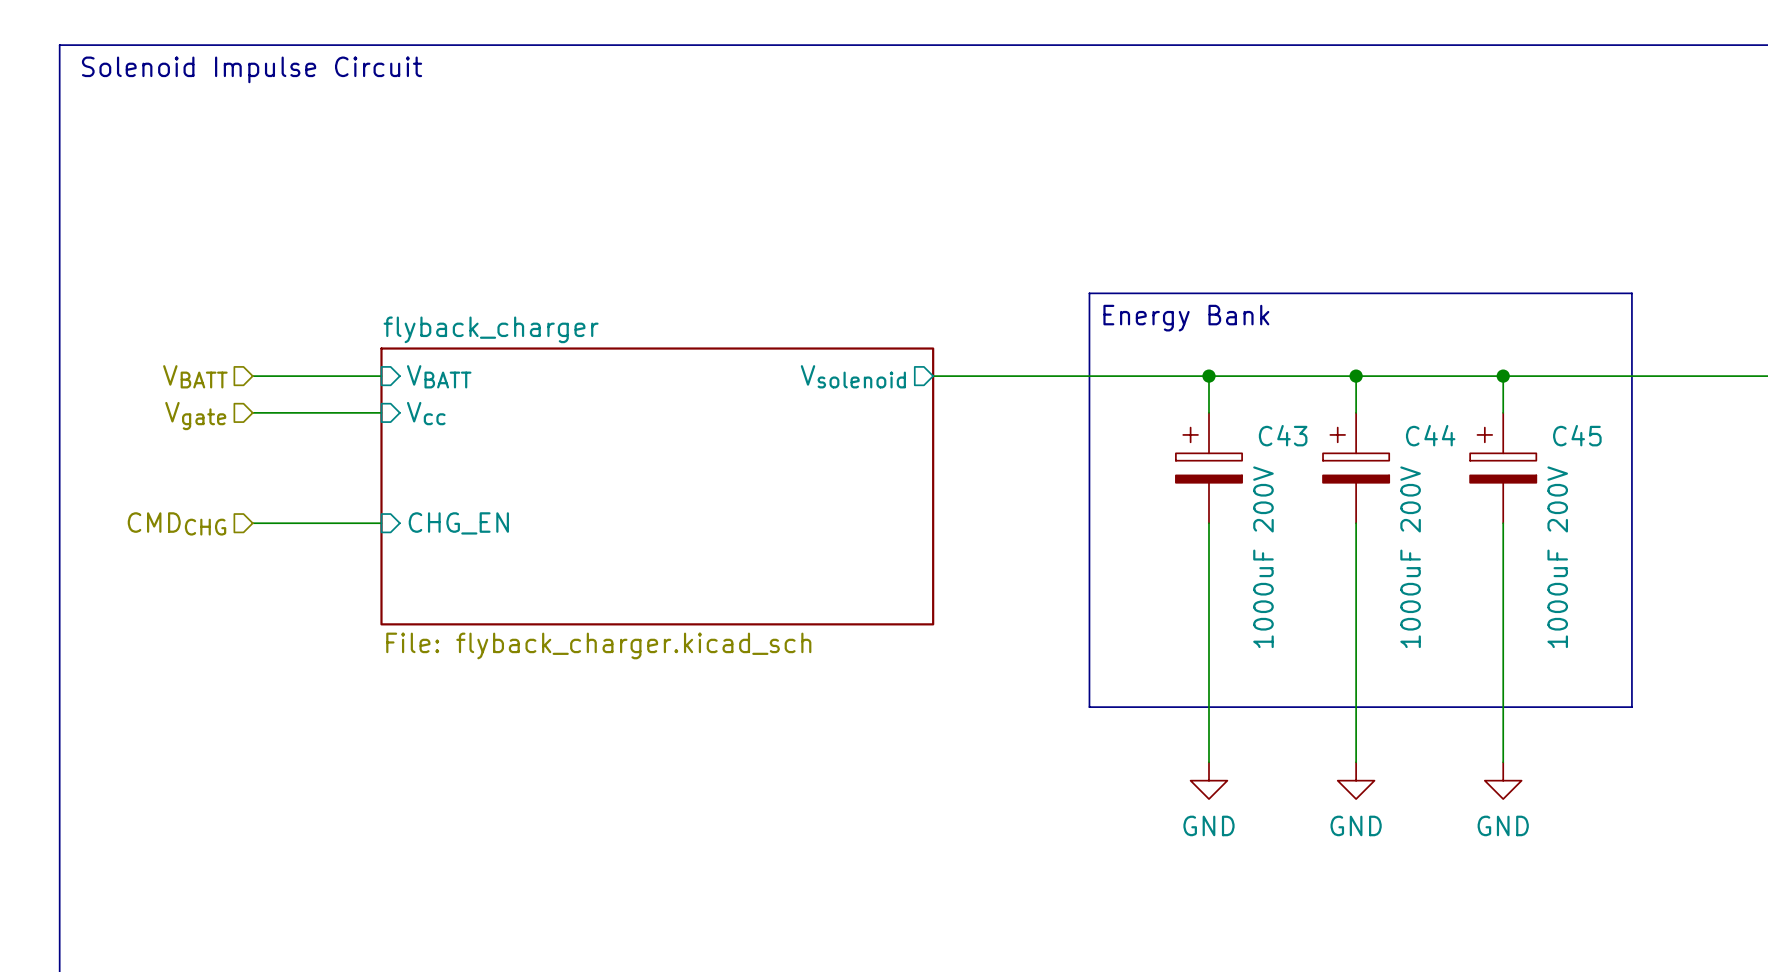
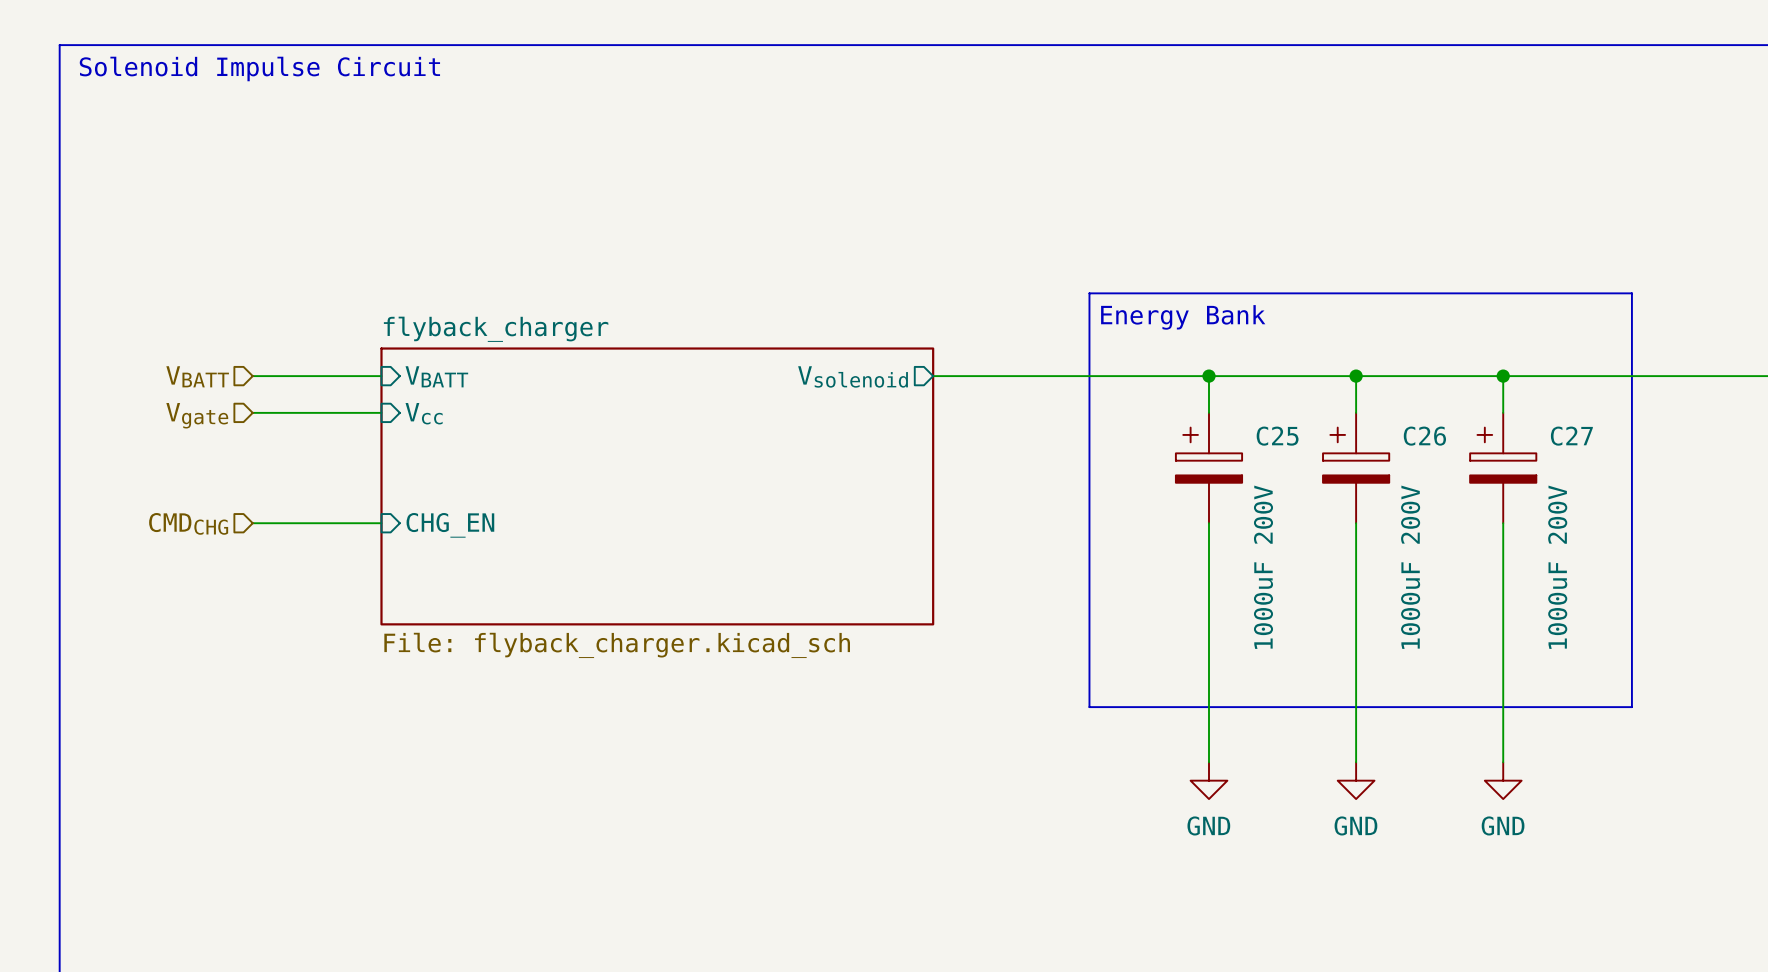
C43 name: C43 (1283, 435) -> C25 (1277, 436)
C44 name: C44 (1430, 435) -> C26 (1424, 436)
C45 name: C45 (1577, 435) -> C27 (1571, 436)

